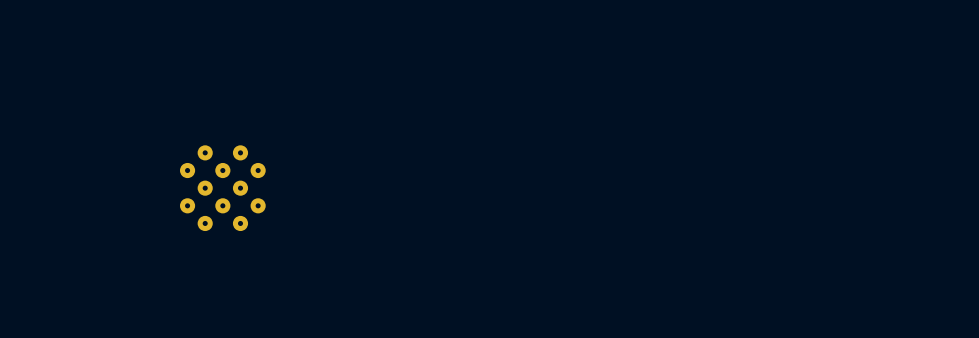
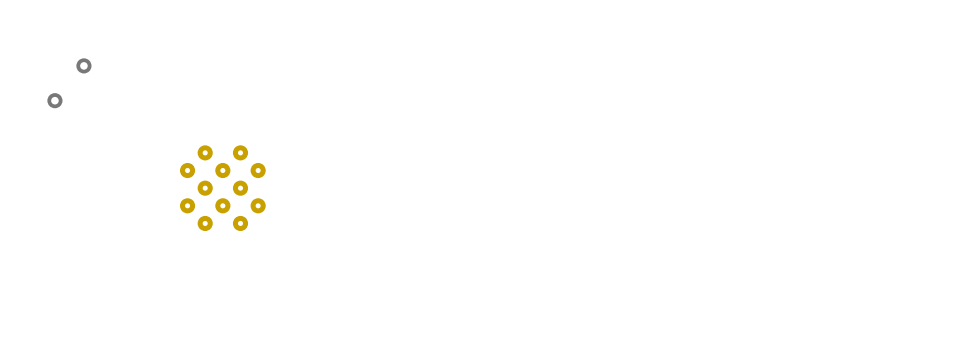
via: none -> (83, 65)
via: none -> (54, 100)

